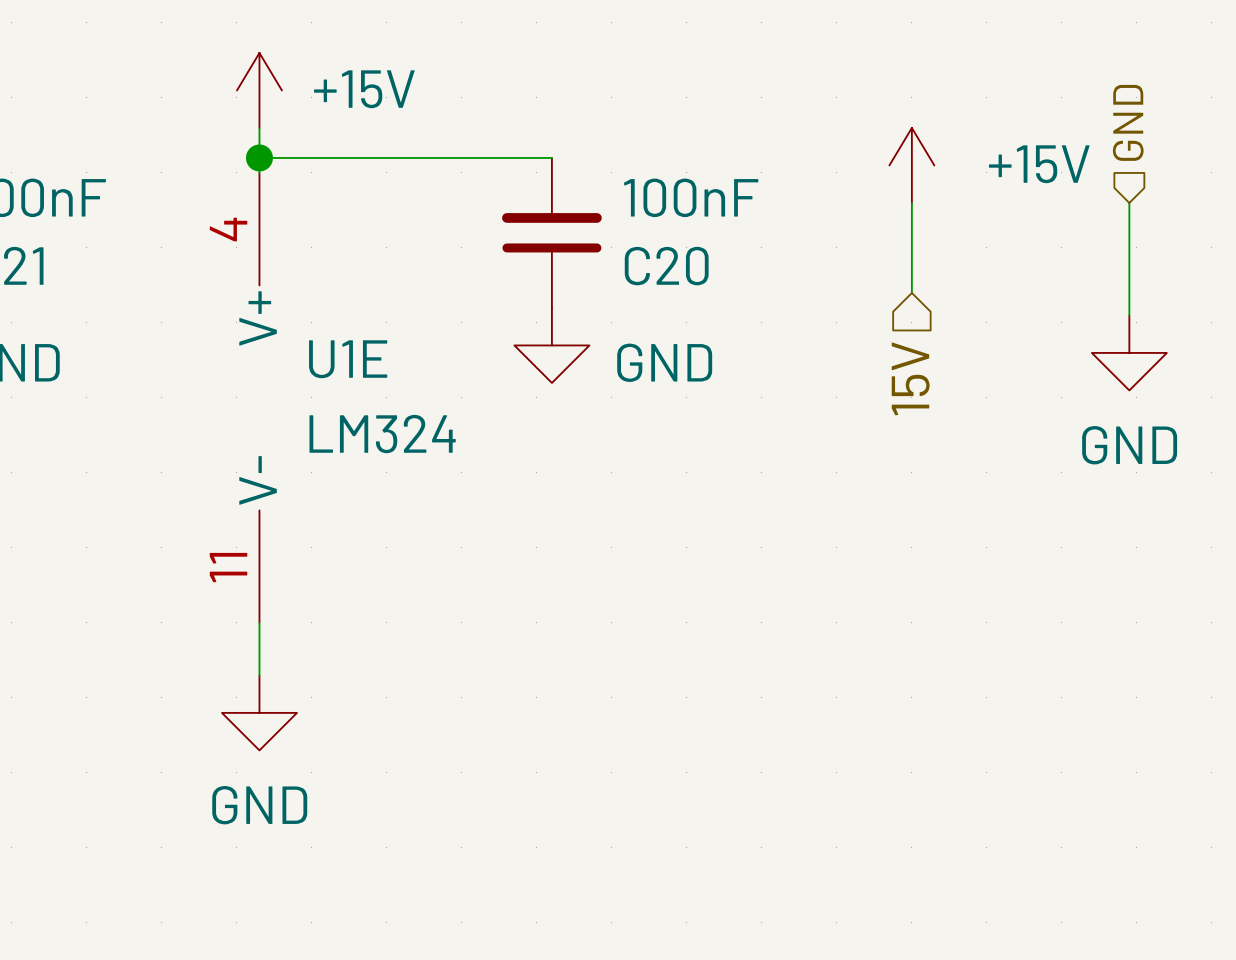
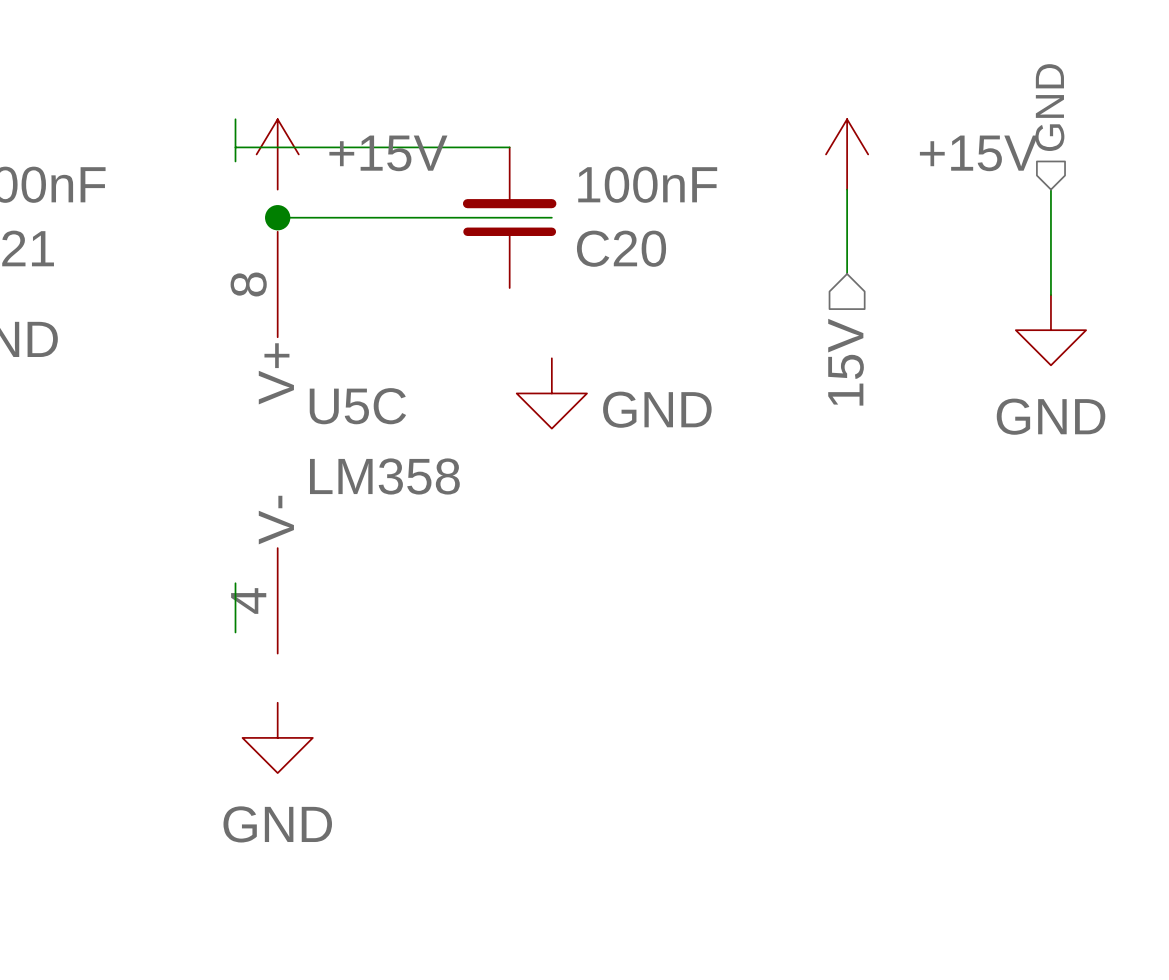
power symbol position: +15V (259, 90) -> +15V (277, 154)
junction position: (259, 157) -> (277, 217)
wire: none -> (277, 217) (551, 217)
power symbol position: GND (551, 345) -> GND (551, 393)
U1E: LM324 (259, 397) -> none
U5C: none -> LM358 (277, 442)
power symbol position: GND (259, 712) -> GND (277, 737)

